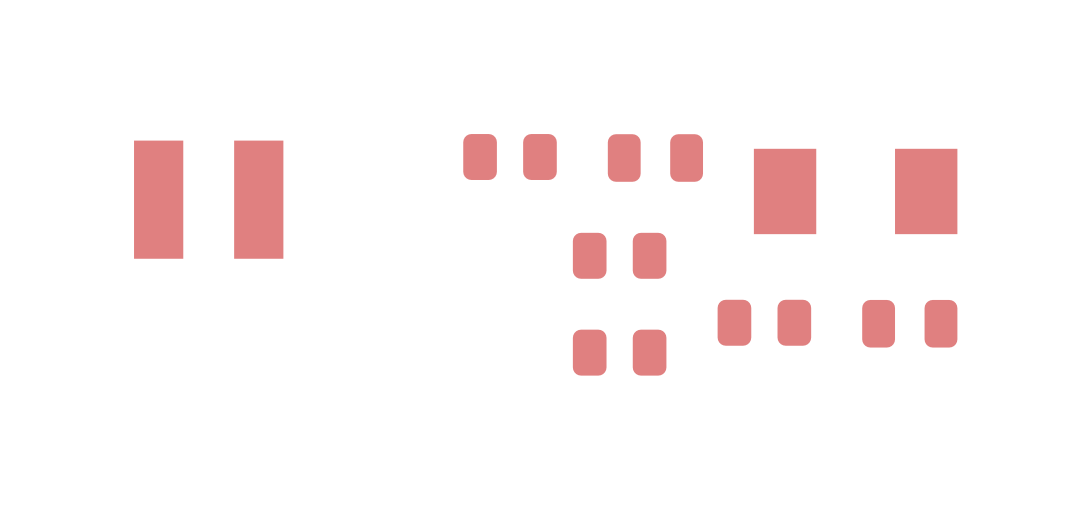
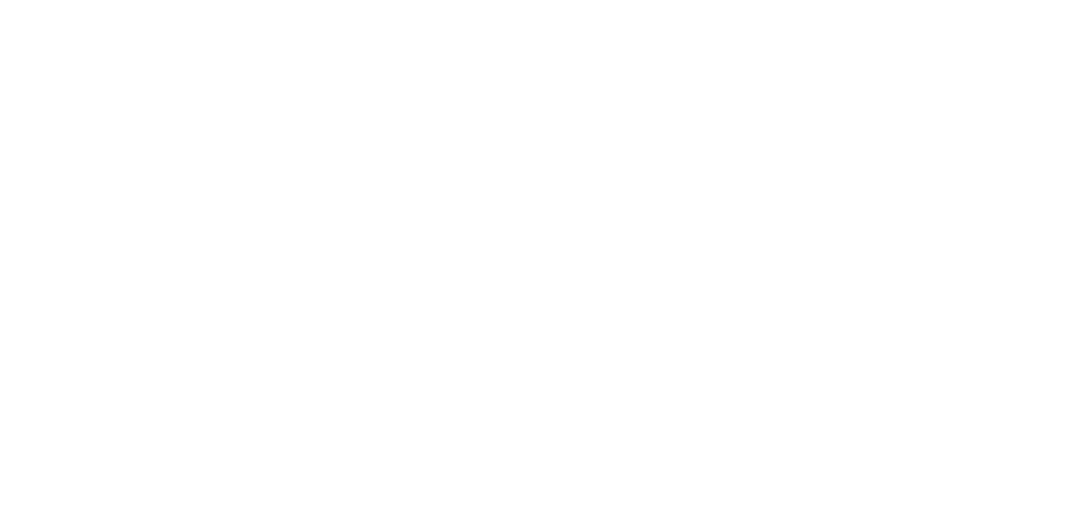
part: (510, 157) -> none
part: (655, 157) -> none
part: (855, 191) -> none
part: (208, 199) -> none
part: (619, 255) -> none
part: (764, 322) -> none
part: (909, 323) -> none
part: (619, 352) -> none

